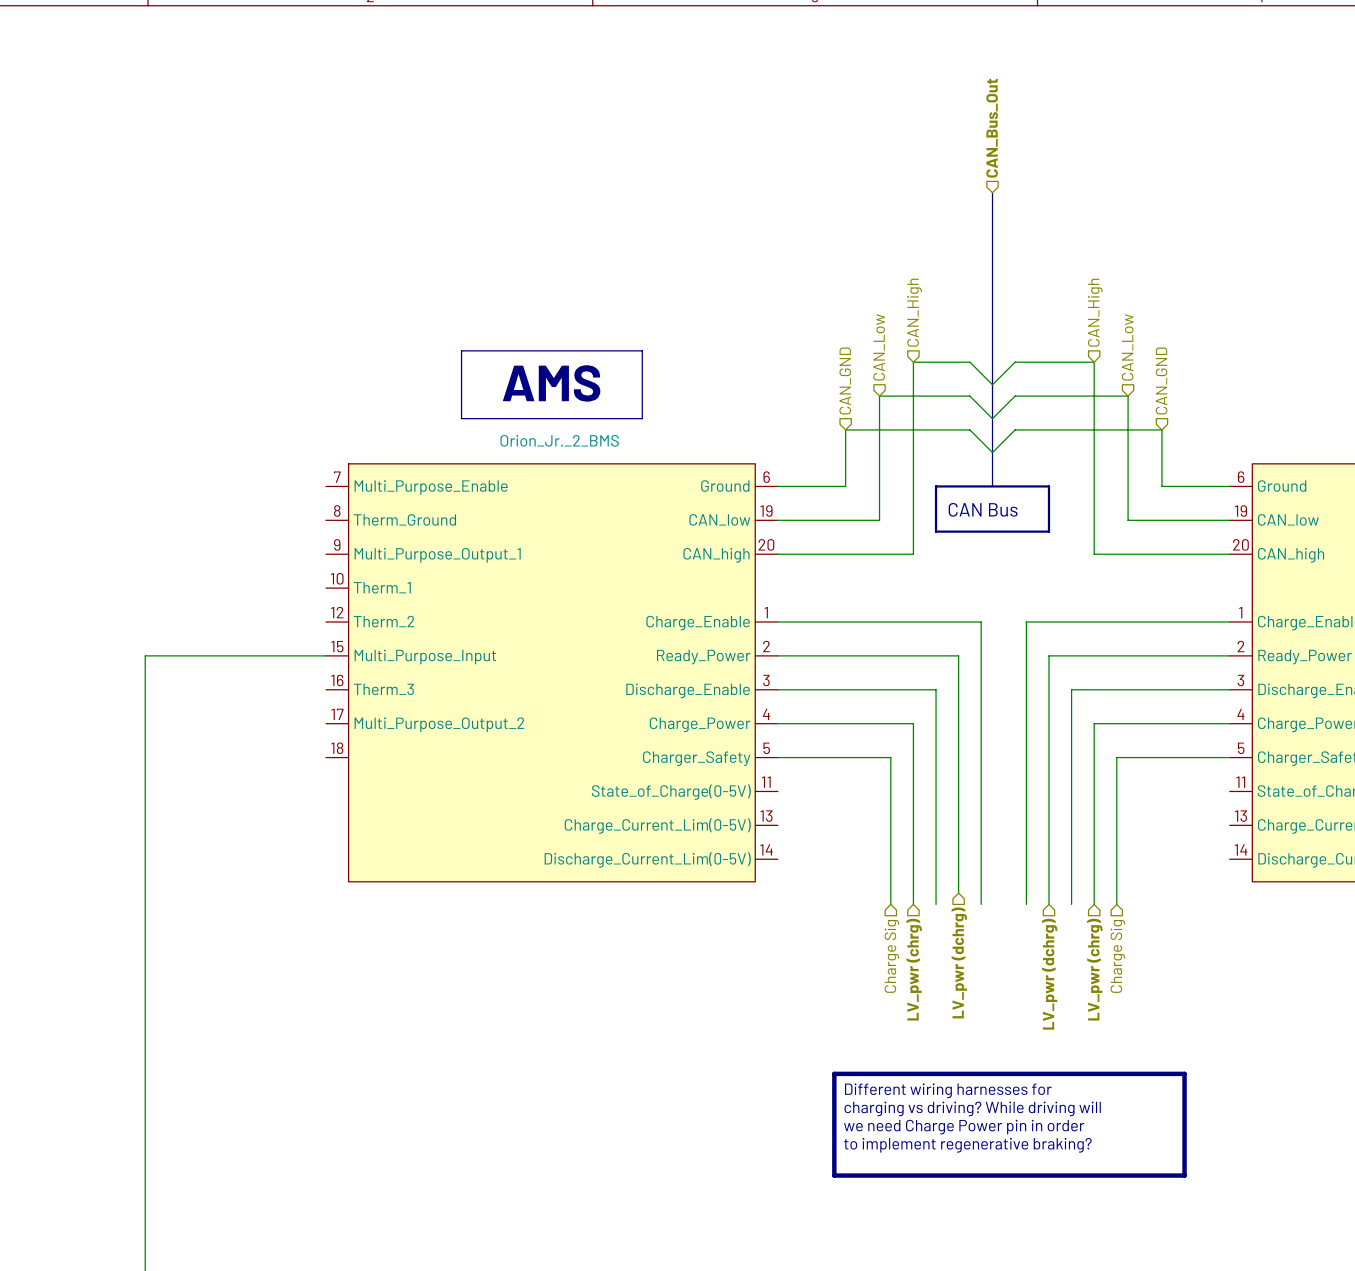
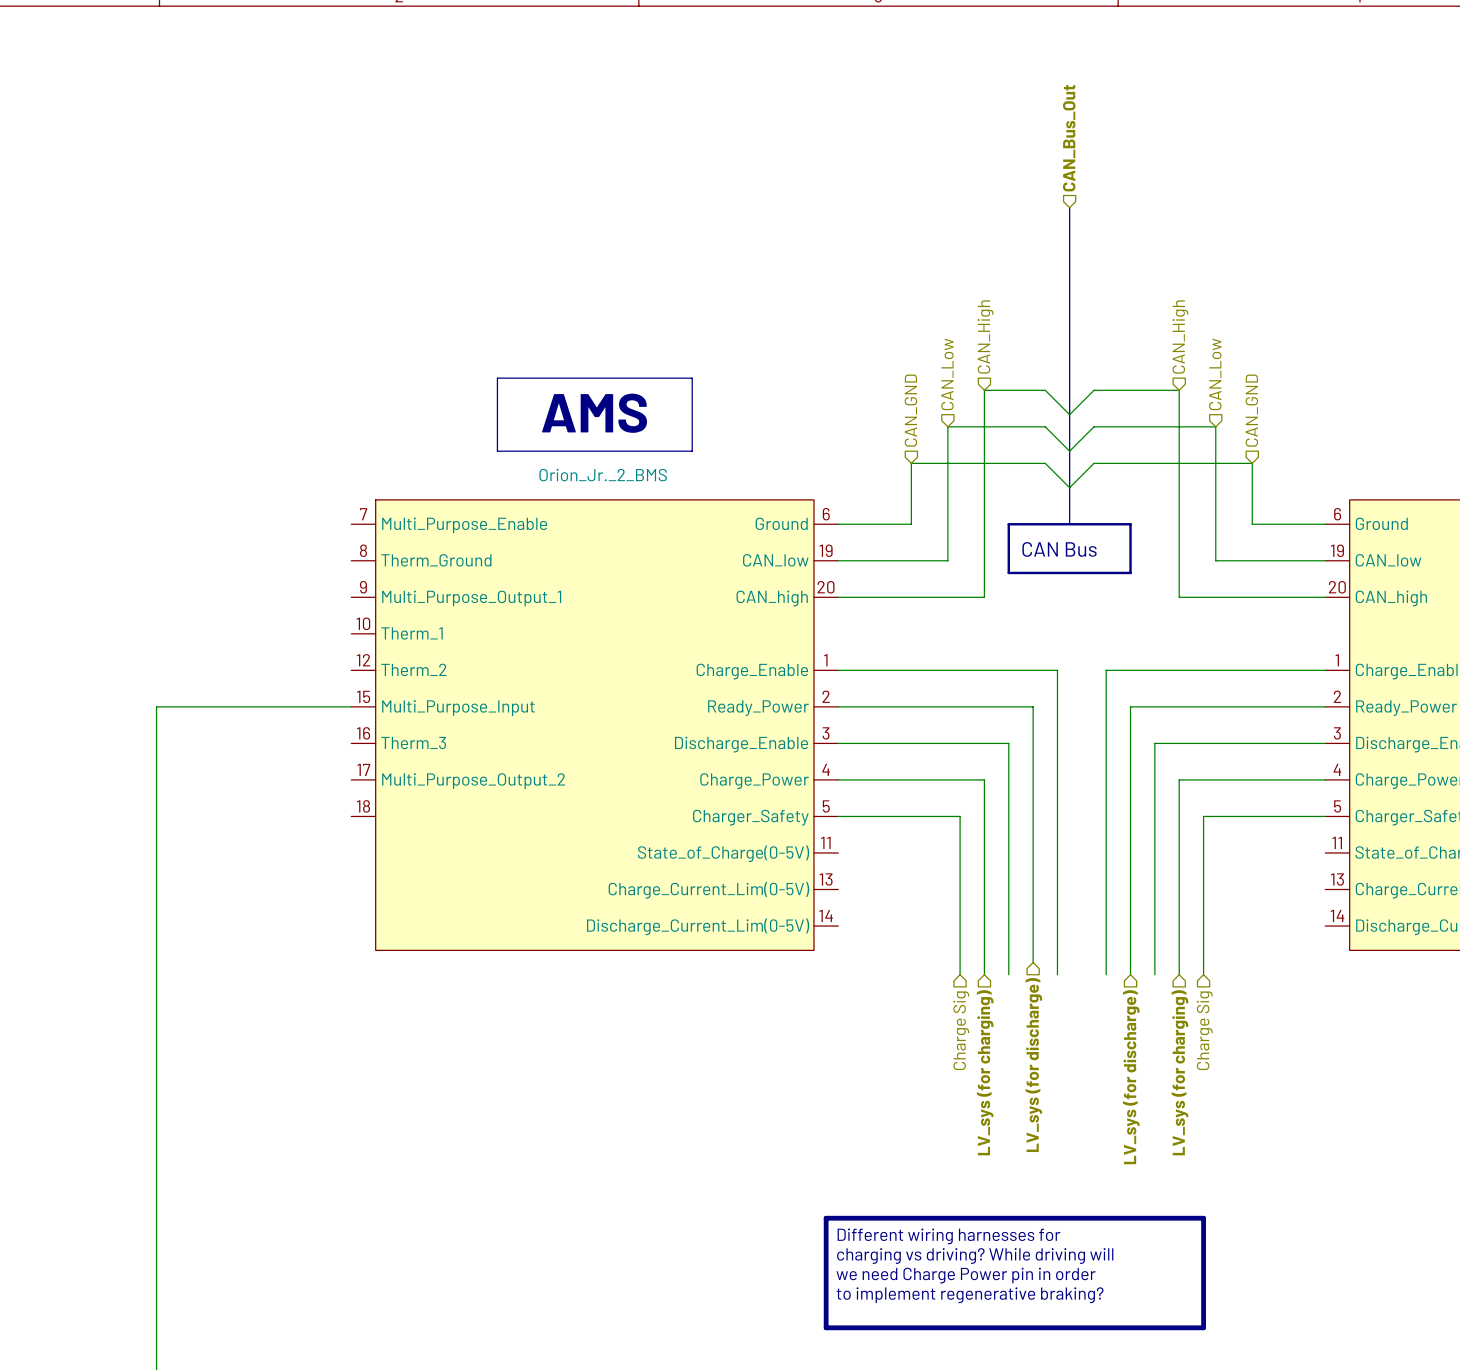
hierarchical label: LV_pwr (dchrg) (959, 962) -> LV_sys (for discharge) (1033, 1065)
hierarchical label: LV_pwr (chrg) (914, 969) -> LV_sys (for charging) (985, 1072)
hierarchical label: LV_pwr (chrg) (1094, 969) -> LV_sys (for charging) (1179, 1072)
hierarchical label: LV_pwr (dchrg) (1049, 974) -> LV_sys (for discharge) (1131, 1077)
line: (834, 1073) (1184, 1073) (1184, 1175) (834, 1175) (834, 1073) -> (826, 1218) (1203, 1218) (1203, 1327) (826, 1327) (826, 1218)
text position: Different wiring harnesses for (948, 1090) -> Different wiring harnesses for (949, 1236)
text position: charging vs driving? While driving will (972, 1108) -> charging vs driving? While driving will (975, 1256)
text position: we need Charge Power pin in order (964, 1127) -> we need Charge Power pin in order (966, 1275)
text position: to implement regenerative braking? (967, 1145) -> to implement regenerative braking? (970, 1295)

